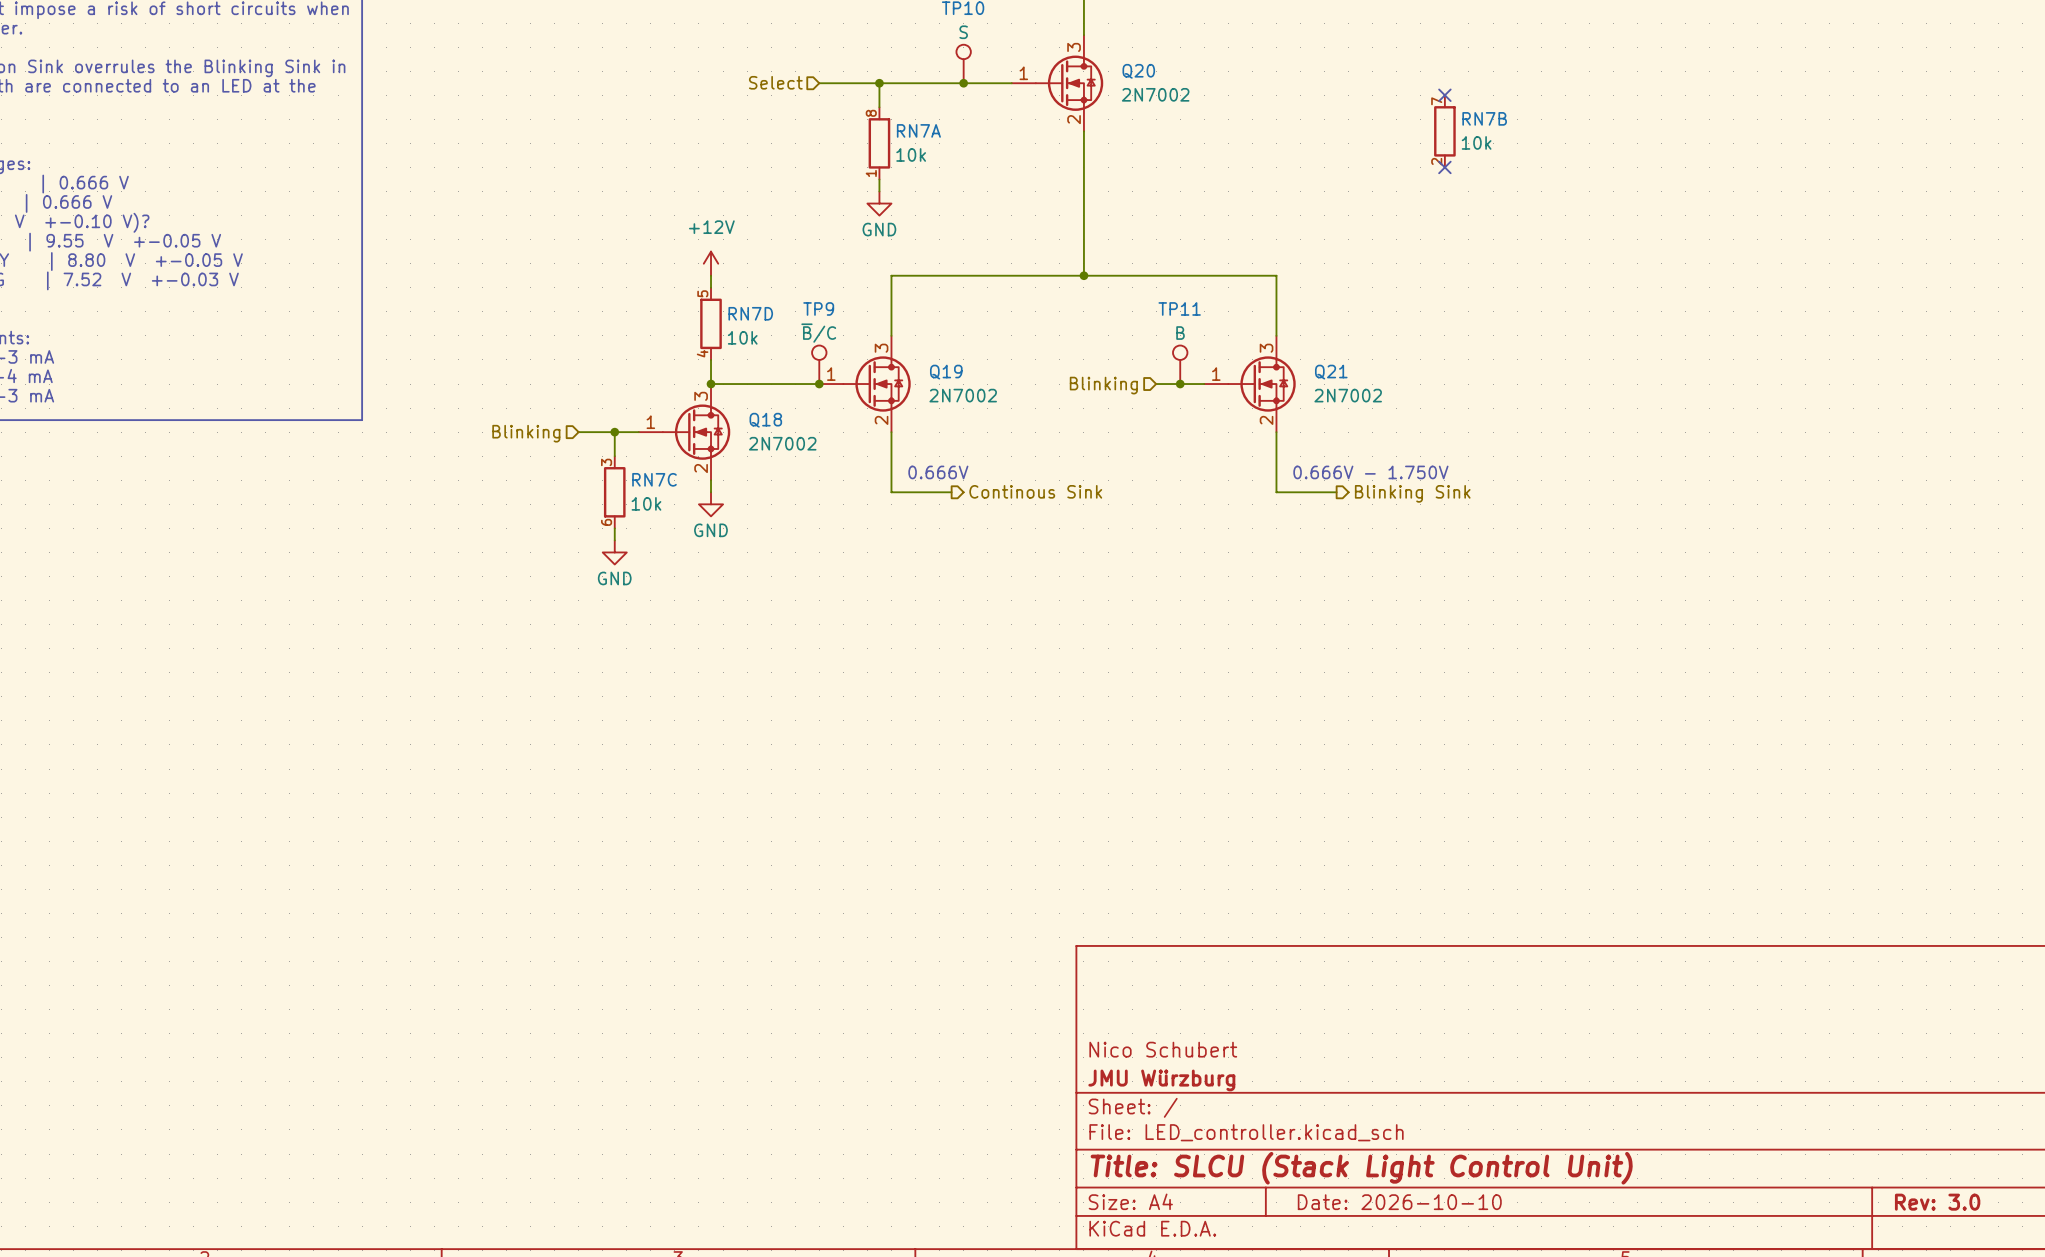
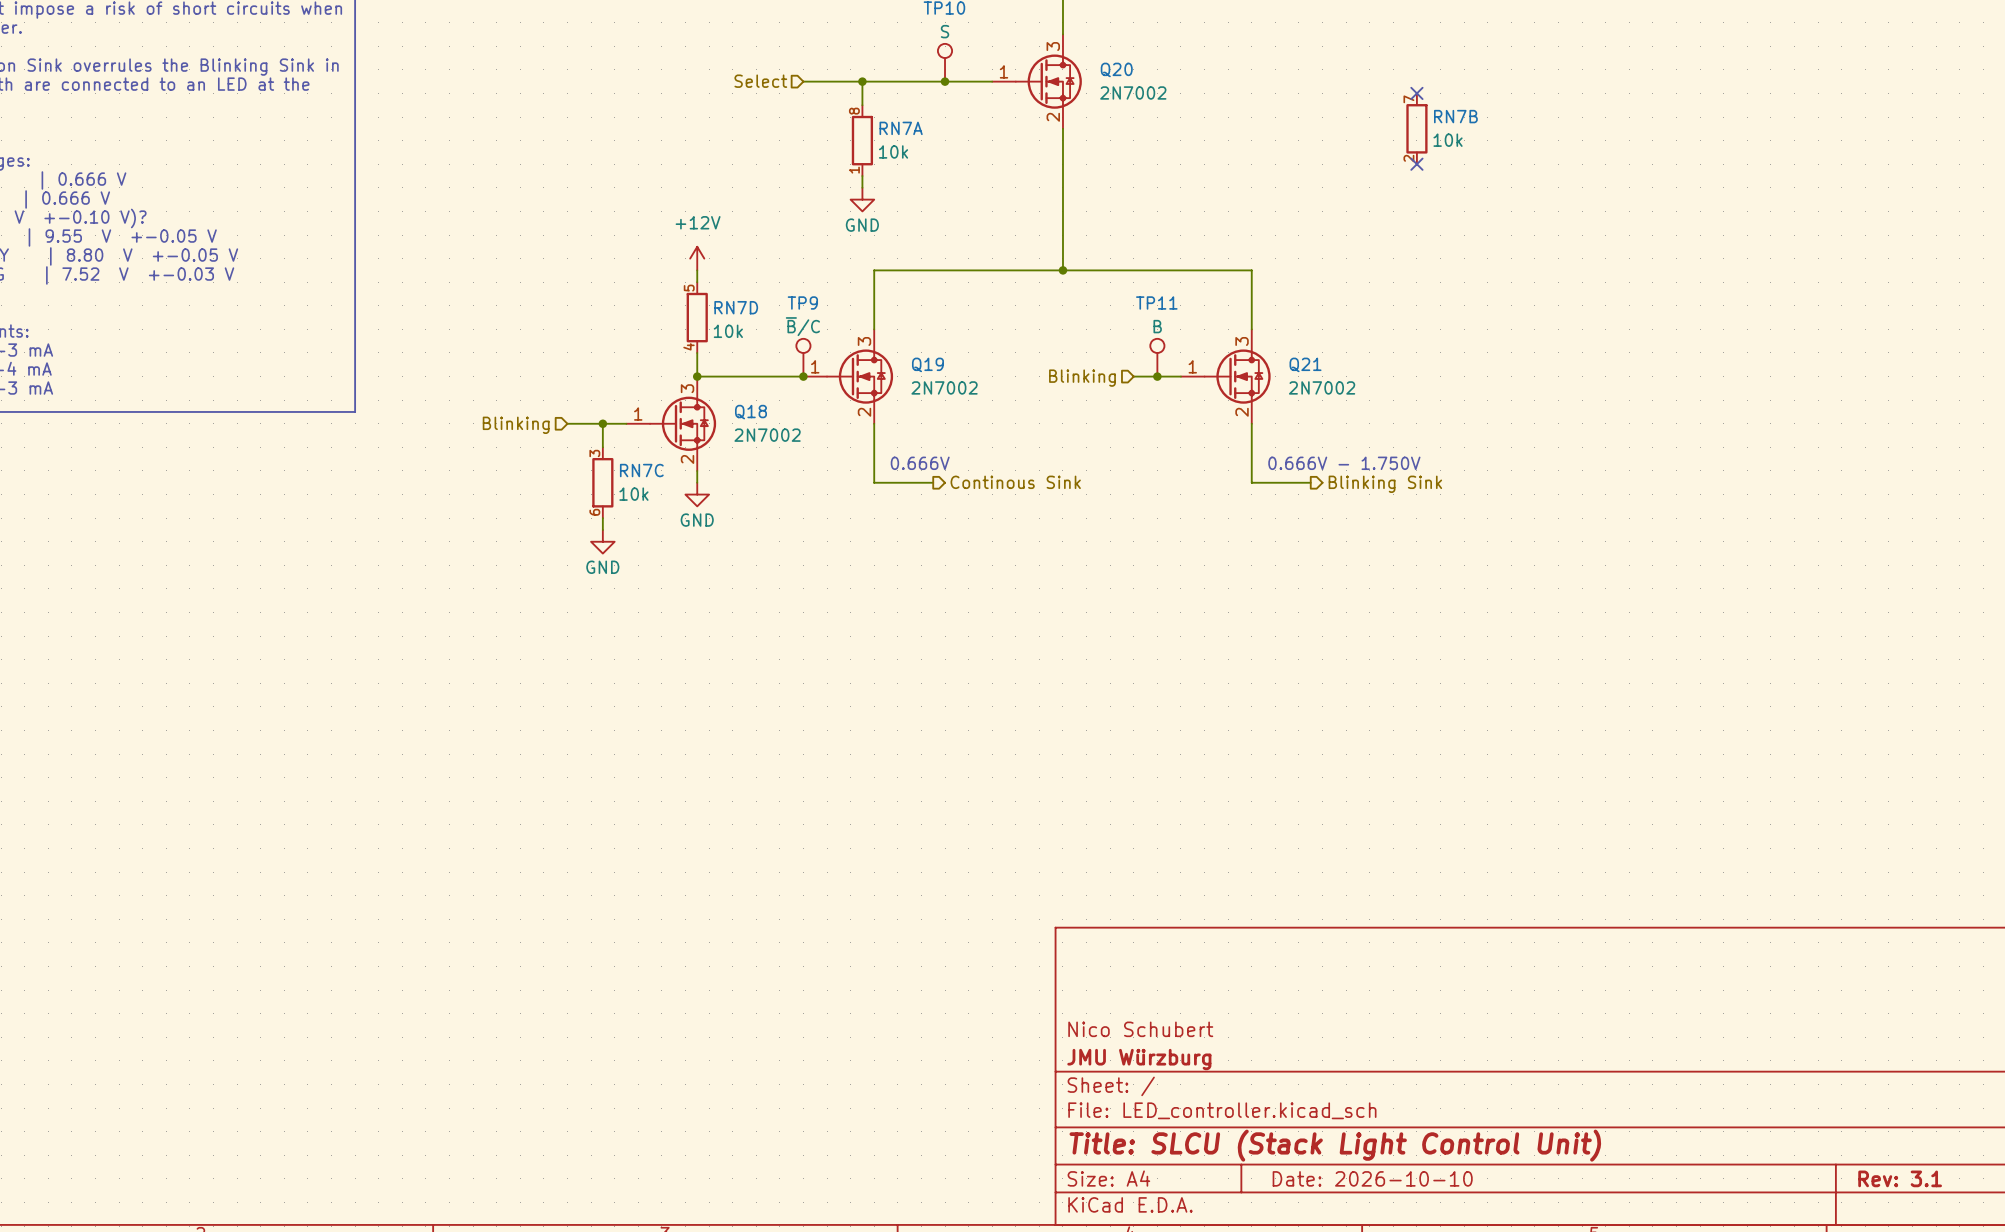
title block: Rev: 3.0 (1937, 1202) -> Rev: 3.1 (1900, 1178)

